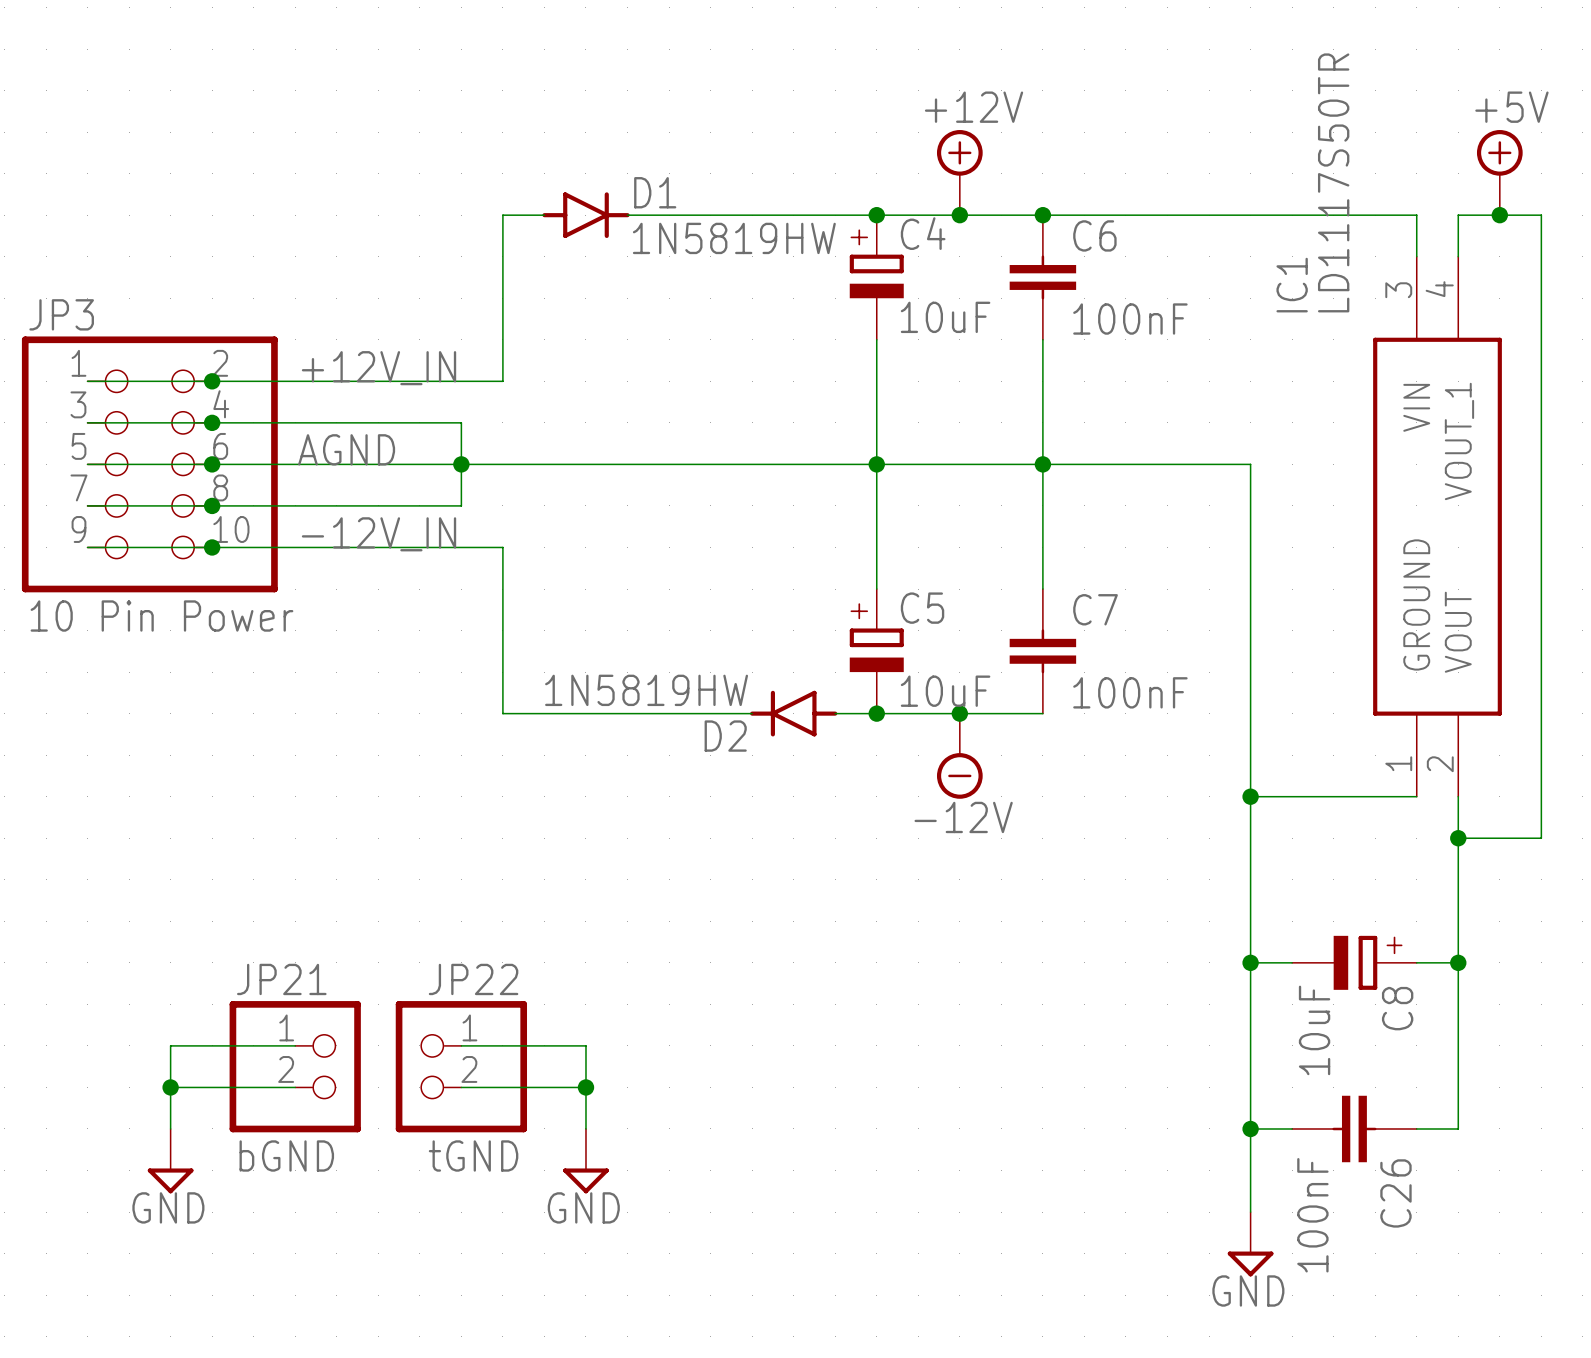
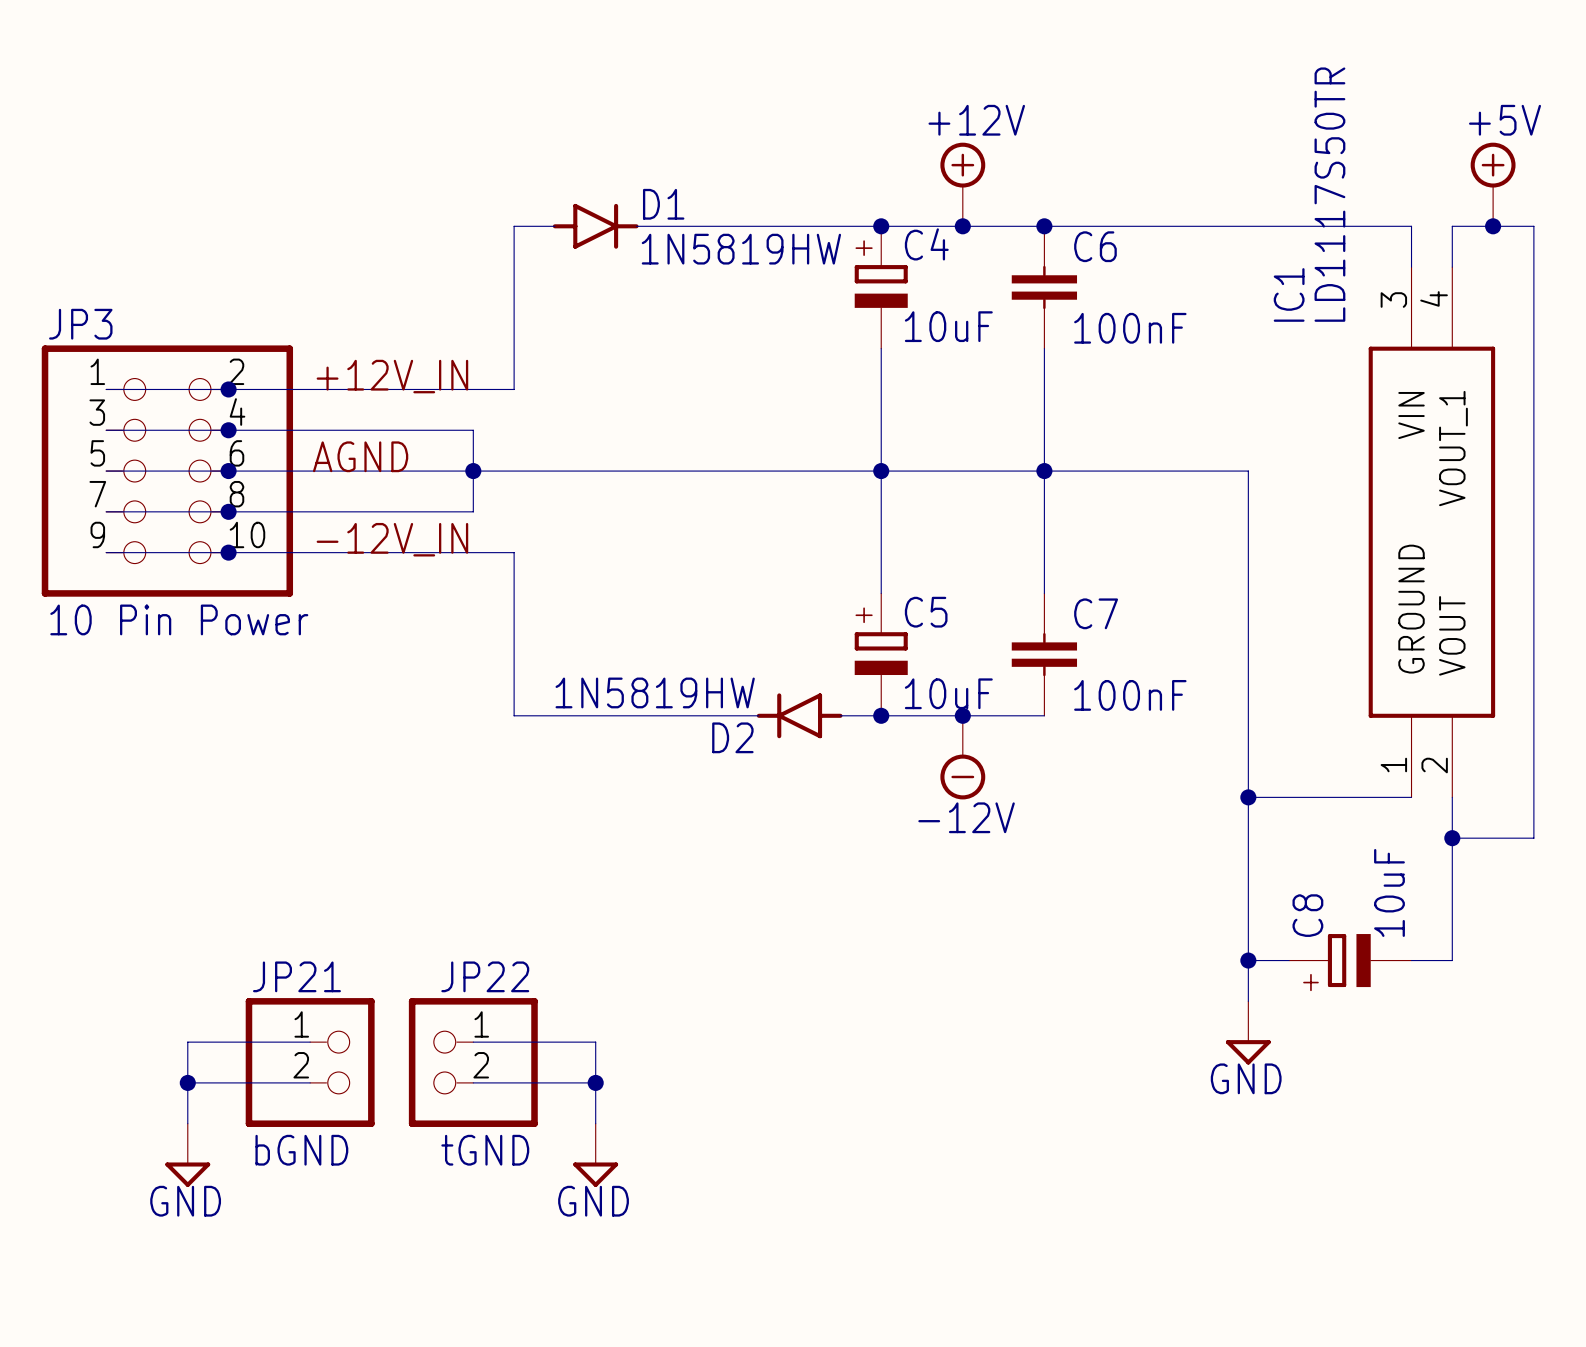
C8 symbol: [1292, 935, 1417, 990] -> [1289, 934, 1412, 988]
wire: (1458, 962) (1458, 1128) (1416, 1128) -> none
junction: (1458, 962) -> none
wire: (1250, 1004) (1250, 1212) -> none
C8 name position: C8 (1397, 1008) -> C8 (1307, 915)
C8 value position: 10uF (1314, 1030) -> 10uF (1389, 892)
wire: (1250, 1128) (1292, 1128) -> none
junction: (1250, 1128) -> none
C26: 100nF (1354, 1128) -> none
power symbol position: GND (1250, 1244) -> GND (1248, 1032)

